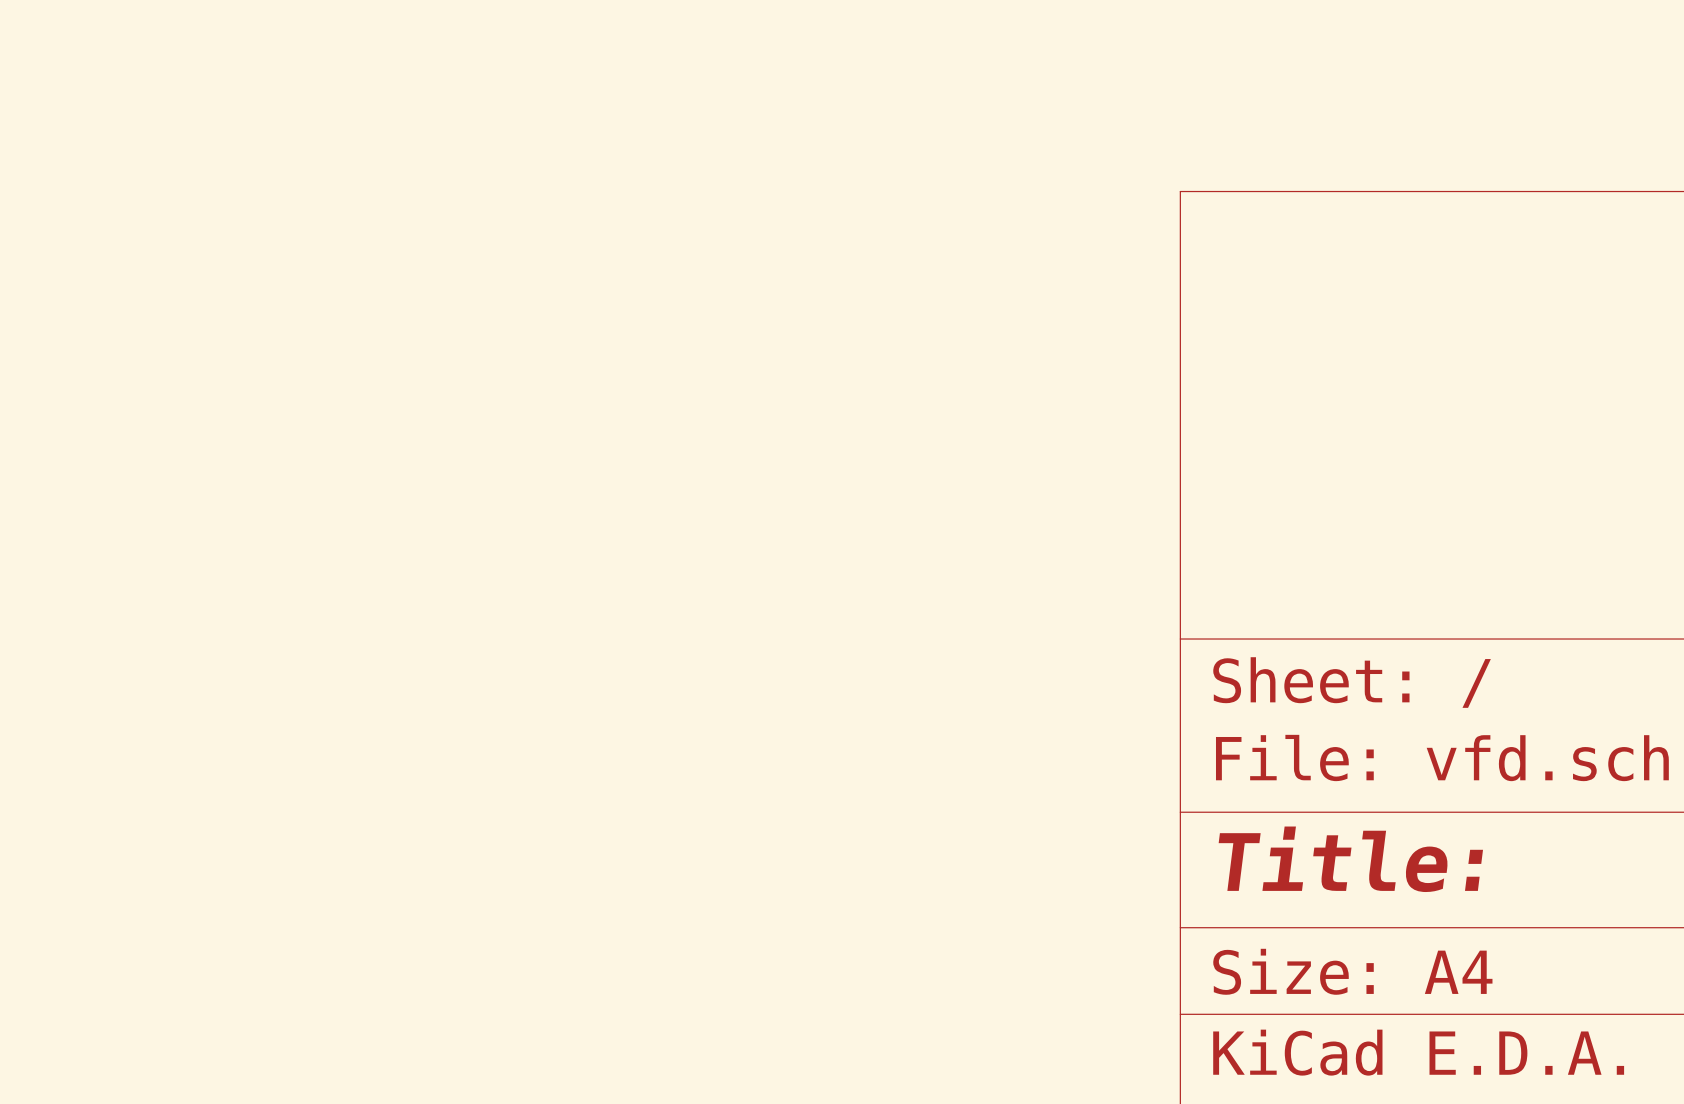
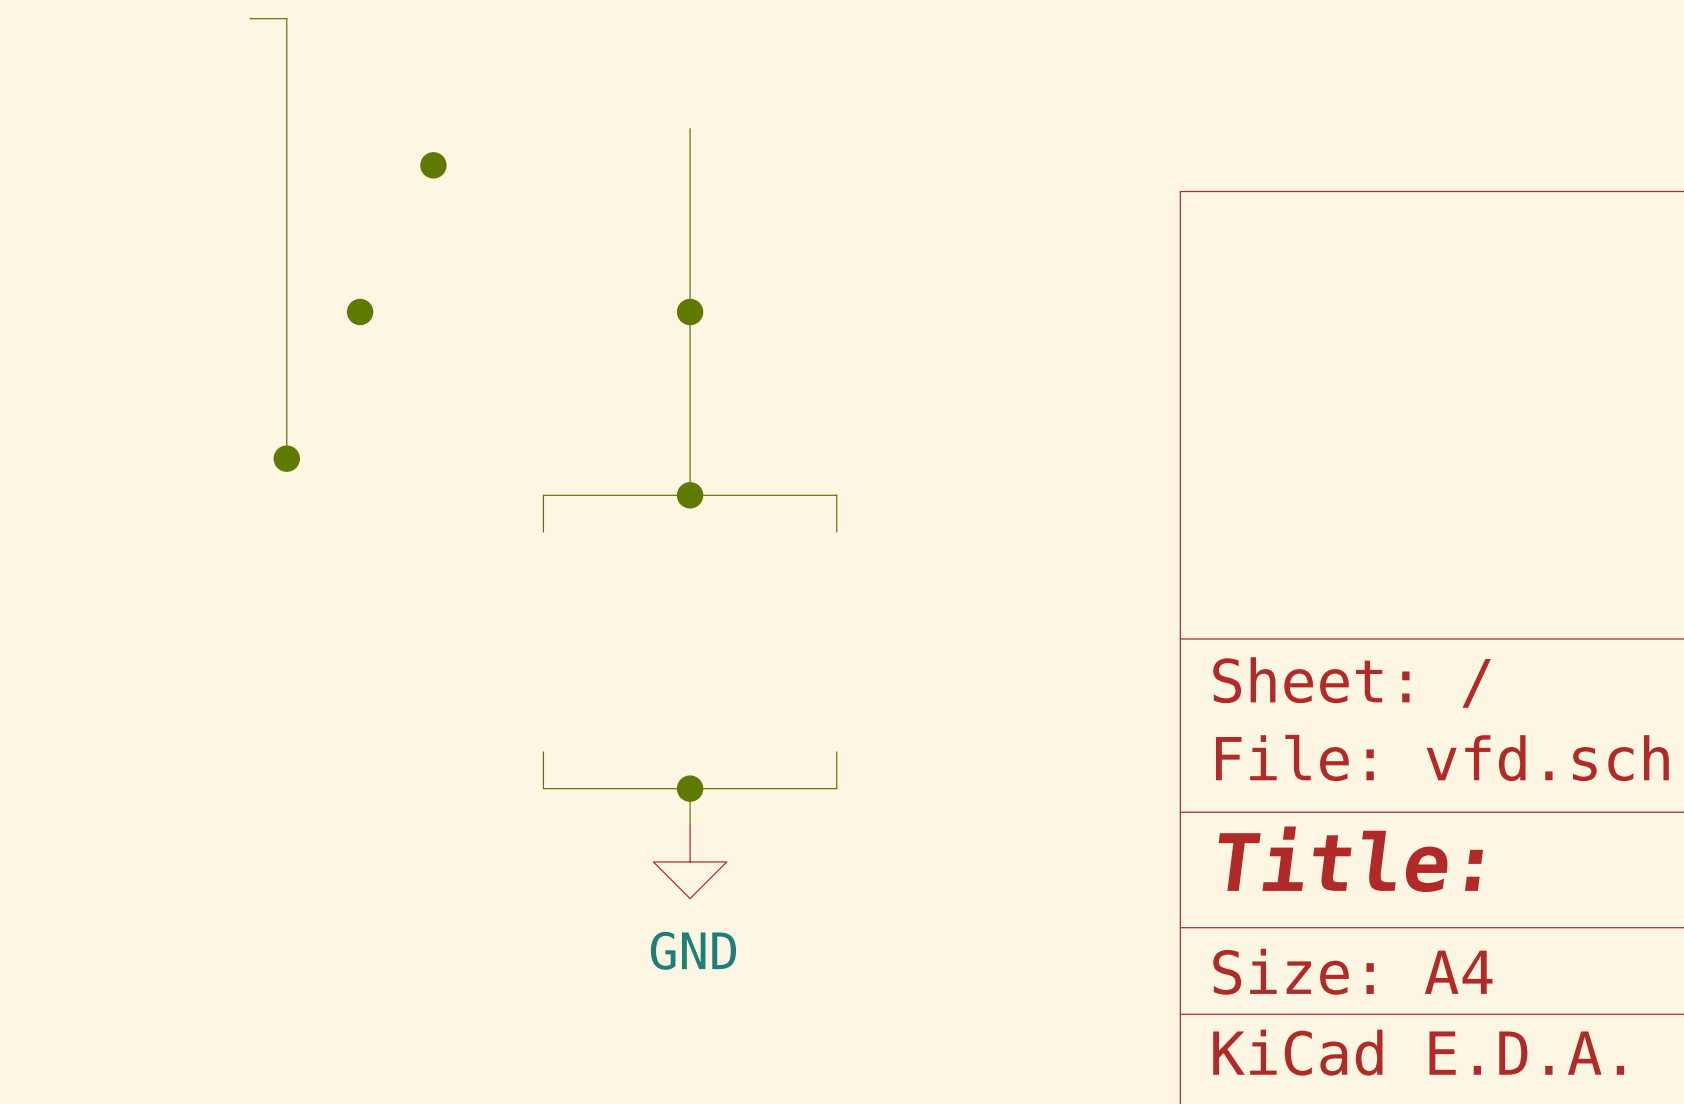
wire: none -> (250, 18) (286, 18) (286, 458)
wire: none -> (690, 128) (690, 495)
junction: none -> (433, 165)
junction: none -> (360, 311)
junction: none -> (690, 311)
junction: none -> (286, 458)
junction: none -> (690, 495)
wire: none -> (543, 531) (543, 495) (836, 495) (836, 531)
wire: none -> (543, 751) (543, 788) (836, 788) (836, 751)
wire: none -> (690, 788) (690, 825)
junction: none -> (690, 788)
power symbol: none -> GND (690, 861)

